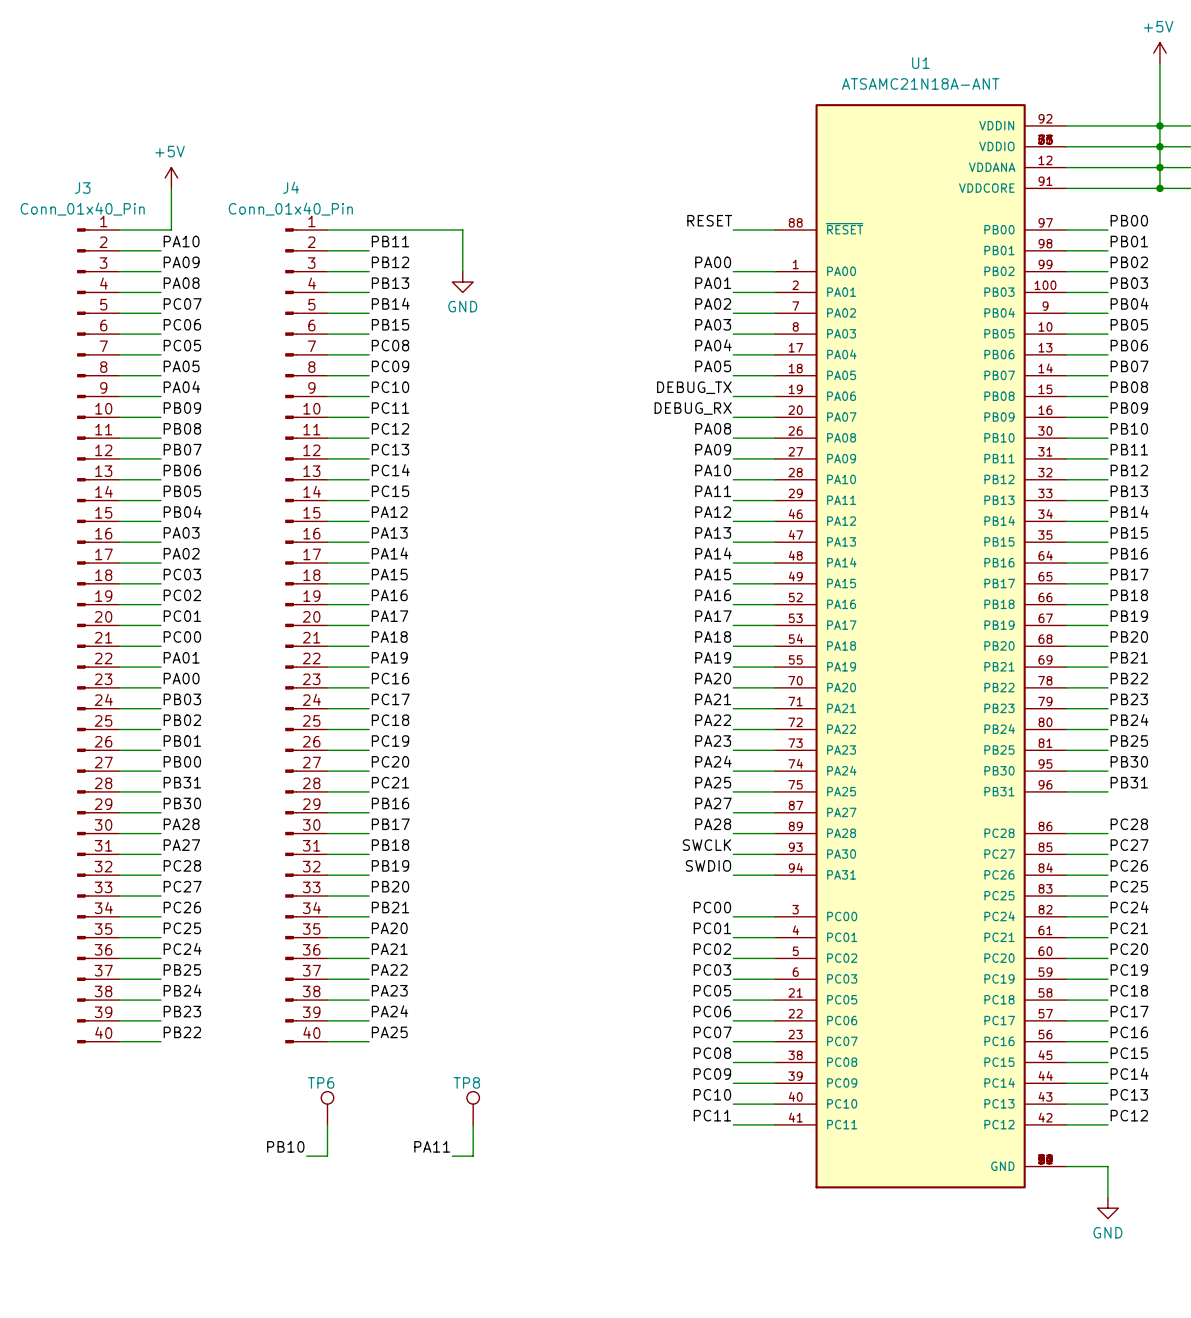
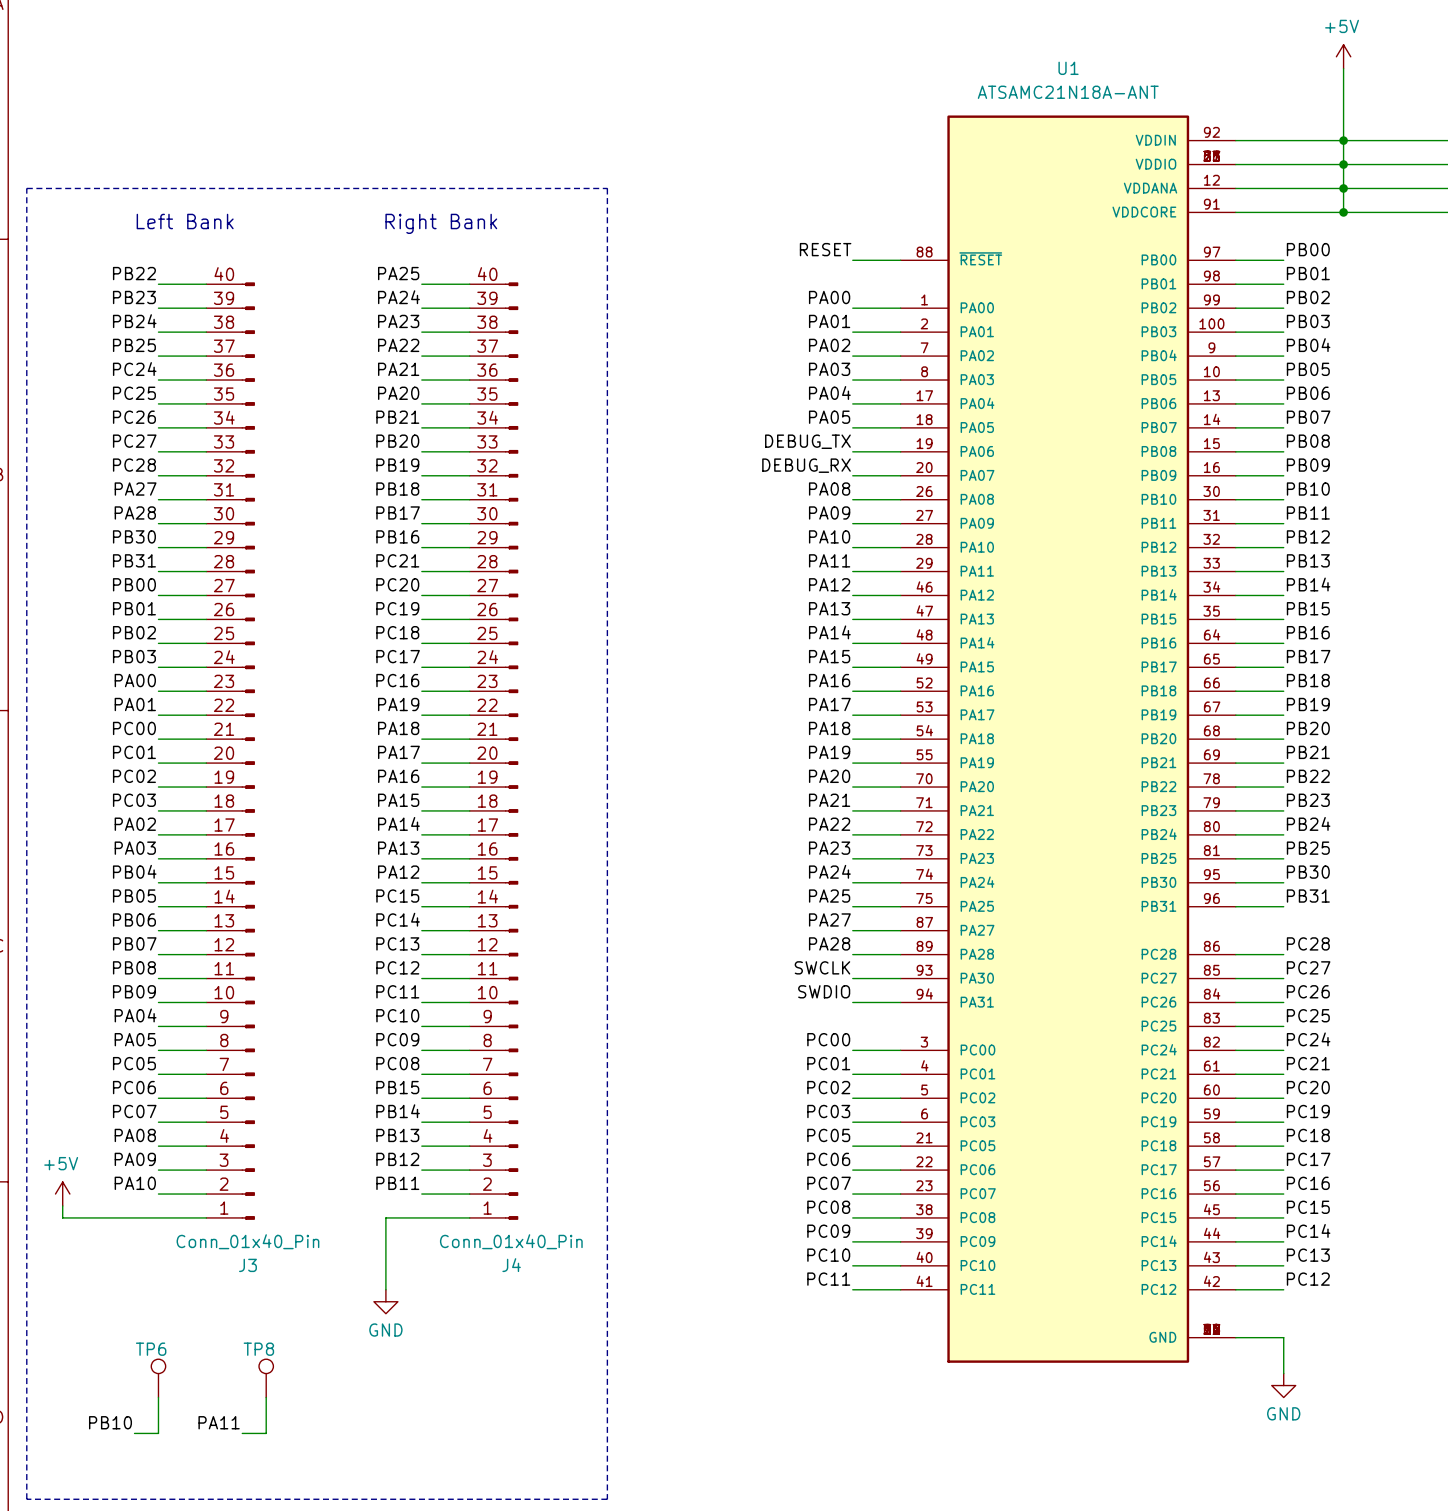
line: none -> (26, 188) (607, 188) (607, 1499) (26, 1499) (26, 188)
power symbol: +5V (171, 177) -> none
wire: (171, 188) (171, 230) (119, 230) -> none
text: none -> Left Bank (185, 221)
text: none -> Right Bank (441, 223)
wire: (327, 230) (462, 230) (462, 271) -> none
label: none -> PB22 (134, 273)
label: PA10 (181, 241) -> none
label: none -> PA25 (398, 273)
label: PB11 (390, 241) -> none
wire: (119, 250) (129, 250) -> (194, 284) (206, 284)
wire: (327, 250) (358, 250) -> (433, 284) (469, 284)
label: none -> PB23 (134, 297)
label: PA09 (181, 262) -> none
label: none -> PA24 (398, 297)
label: PB12 (390, 262) -> none
wire: (119, 271) (129, 271) -> (194, 308) (206, 308)
wire: (327, 271) (358, 271) -> (433, 308) (469, 308)
label: none -> PB24 (134, 321)
power symbol: GND (462, 282) -> none
label: PA08 (181, 283) -> none
label: none -> PA23 (398, 321)
label: PB13 (390, 283) -> none
wire: (119, 292) (129, 292) -> (194, 332) (206, 332)
wire: (327, 292) (358, 292) -> (433, 332) (469, 332)
label: none -> PB25 (134, 345)
label: PC07 (182, 303) -> none
label: none -> PA22 (398, 345)
label: PB14 (390, 303) -> none
wire: (119, 313) (129, 313) -> (194, 356) (206, 356)
wire: (327, 313) (358, 313) -> (433, 356) (469, 356)
label: none -> PC24 (134, 369)
label: PC06 (182, 324) -> none
label: none -> PA21 (398, 369)
label: PB15 (390, 324) -> none
wire: (119, 334) (129, 334) -> (194, 380) (206, 380)
wire: (327, 334) (358, 334) -> (433, 380) (469, 380)
label: none -> PC25 (134, 393)
label: PC05 (182, 345) -> none
label: none -> PA20 (398, 393)
label: PC08 (390, 345) -> none
wire: (119, 354) (129, 354) -> (194, 403) (206, 403)
wire: (327, 354) (358, 354) -> (433, 403) (469, 403)
label: none -> PC26 (134, 417)
label: PA05 (181, 366) -> none
label: none -> PB21 (397, 417)
label: PC09 (390, 366) -> none
wire: (119, 375) (129, 375) -> (194, 427) (206, 427)
wire: (327, 375) (358, 375) -> (433, 427) (469, 427)
label: PA04 (181, 386) -> none
label: none -> PC27 (134, 441)
label: none -> PB20 (397, 441)
label: PC10 (390, 387) -> none
wire: (119, 396) (129, 396) -> (194, 451) (206, 451)
wire: (327, 396) (358, 396) -> (433, 451) (469, 451)
label: none -> PC28 (134, 465)
label: PB09 (182, 408) -> none
label: none -> PB19 (397, 465)
label: PC11 (390, 408) -> none
wire: (119, 417) (129, 417) -> (194, 475) (206, 475)
wire: (327, 417) (358, 417) -> (433, 475) (469, 475)
label: none -> PA27 (135, 489)
label: PB08 (182, 428) -> none
label: none -> PB18 (397, 489)
label: PC12 (390, 428) -> none
wire: (119, 438) (129, 438) -> (194, 499) (206, 499)
wire: (327, 438) (358, 438) -> (433, 499) (469, 499)
label: none -> PA28 (135, 512)
label: PB07 (182, 449) -> none
label: none -> PB17 (398, 512)
label: PC13 (390, 449) -> none
wire: (119, 458) (129, 458) -> (194, 523) (206, 523)
wire: (327, 458) (358, 458) -> (433, 523) (469, 523)
label: none -> PB30 (134, 536)
label: PB06 (182, 470) -> none
label: none -> PB16 (397, 536)
label: PC14 (390, 470) -> none
wire: (119, 479) (129, 479) -> (194, 547) (206, 547)
wire: (327, 479) (358, 479) -> (433, 547) (469, 547)
label: none -> PB31 (134, 560)
label: PB05 (182, 491) -> none
label: none -> PC21 (397, 560)
label: PC15 (390, 491) -> none
wire: (119, 500) (129, 500) -> (194, 571) (206, 571)
wire: (327, 500) (358, 500) -> (433, 571) (469, 571)
label: PB04 (182, 511) -> none
label: none -> PB00 (134, 584)
label: none -> PC20 (397, 584)
label: PA12 (389, 512) -> none
wire: (119, 521) (129, 521) -> (194, 595) (206, 595)
wire: (327, 521) (358, 521) -> (433, 595) (469, 595)
label: none -> PB01 (134, 608)
label: PA03 (181, 532) -> none
label: none -> PC19 (397, 608)
label: PA13 (389, 532) -> none
wire: (119, 542) (129, 542) -> (194, 619) (206, 619)
wire: (327, 542) (358, 542) -> (433, 619) (469, 619)
label position: PA02 (181, 553) -> PA02 (135, 824)
label position: PA14 (390, 553) -> PA14 (398, 823)
wire: (119, 563) (129, 563) -> (194, 643) (206, 643)
wire: (327, 563) (358, 563) -> (433, 643) (469, 643)
label position: PC03 (182, 574) -> PC03 (134, 800)
label position: PA15 (389, 574) -> PA15 (398, 800)
wire: (119, 583) (129, 583) -> (194, 667) (206, 667)
wire: (327, 583) (358, 583) -> (433, 667) (469, 667)
label position: PC02 (182, 595) -> PC02 (134, 776)
label position: PA16 (389, 595) -> PA16 (398, 776)
wire: (119, 604) (129, 604) -> (194, 691) (206, 691)
wire: (327, 604) (358, 604) -> (433, 691) (469, 691)
label position: PC01 (182, 616) -> PC01 (134, 752)
label position: PA17 (390, 616) -> PA17 (398, 752)
wire: (119, 625) (129, 625) -> (194, 715) (206, 715)
wire: (327, 625) (358, 625) -> (433, 715) (469, 715)
J3 rotation: 0° (82, 635) -> 180° (248, 751)
J4 rotation: 0° (291, 635) -> 180° (511, 751)
label position: PC00 (182, 636) -> PC00 (134, 728)
label position: PA18 (389, 636) -> PA18 (398, 728)
wire: (119, 646) (129, 646) -> (194, 739) (206, 739)
wire: (327, 646) (358, 646) -> (433, 739) (469, 739)
label position: PA01 (181, 657) -> PA01 (135, 704)
label position: PA19 (389, 657) -> PA19 (398, 704)
wire: (119, 667) (129, 667) -> (194, 763) (206, 763)
wire: (327, 667) (358, 667) -> (433, 763) (469, 763)
label position: PA00 (181, 678) -> PA00 (135, 680)
label position: PC16 (390, 678) -> PC16 (397, 680)
wire: (119, 687) (129, 687) -> (194, 787) (206, 787)
wire: (327, 687) (358, 687) -> (433, 787) (469, 787)
label position: PB03 (182, 699) -> PB03 (134, 656)
label position: PC17 (390, 699) -> PC17 (398, 656)
wire: (119, 708) (129, 708) -> (194, 810) (206, 810)
wire: (327, 708) (358, 708) -> (433, 810) (469, 810)
label position: PB02 (182, 720) -> PB02 (134, 632)
label position: PC18 (390, 720) -> PC18 (397, 632)
wire: (119, 729) (129, 729) -> (194, 834) (206, 834)
wire: (327, 729) (358, 729) -> (433, 834) (469, 834)
label: none -> PA03 (135, 848)
label: PB01 (182, 741) -> none
label: none -> PA13 (398, 848)
label: PC19 (390, 741) -> none
wire: (119, 750) (129, 750) -> (194, 858) (206, 858)
wire: (327, 750) (358, 750) -> (433, 858) (469, 858)
label: none -> PB04 (134, 871)
label: PB00 (182, 761) -> none
label: none -> PA12 (398, 872)
label: PC20 (390, 761) -> none
wire: (119, 771) (129, 771) -> (194, 882) (206, 882)
wire: (327, 771) (358, 771) -> (433, 882) (469, 882)
label: none -> PB05 (134, 896)
label: PB31 (182, 782) -> none
label: none -> PC15 (397, 896)
label: PC21 (390, 782) -> none
wire: (119, 791) (129, 791) -> (194, 906) (206, 906)
wire: (327, 791) (358, 791) -> (433, 906) (469, 906)
label: none -> PB06 (134, 919)
label: PB30 (182, 803) -> none
label: none -> PC14 (398, 919)
label: PB16 (390, 803) -> none
wire: (119, 812) (129, 812) -> (194, 930) (206, 930)
wire: (327, 812) (358, 812) -> (433, 930) (469, 930)
label: none -> PB07 (134, 943)
label: PA28 (181, 824) -> none
label: none -> PC13 (397, 943)
label: PB17 (390, 824) -> none
wire: (119, 833) (129, 833) -> (194, 954) (206, 954)
wire: (327, 833) (358, 833) -> (433, 954) (469, 954)
label: none -> PB08 (134, 967)
label: PA27 (181, 845) -> none
label: none -> PC12 (397, 967)
label: PB18 (390, 845) -> none
wire: (119, 854) (129, 854) -> (194, 978) (206, 978)
wire: (327, 854) (358, 854) -> (433, 978) (469, 978)
label: none -> PB09 (134, 991)
label: PC28 (182, 865) -> none
label: none -> PC11 (397, 991)
label: PB19 (390, 865) -> none
wire: (119, 875) (129, 875) -> (194, 1002) (206, 1002)
wire: (327, 875) (358, 875) -> (433, 1002) (469, 1002)
label: none -> PA04 (135, 1015)
label: PC27 (182, 886) -> none
label: none -> PC10 (397, 1015)
label: PB20 (390, 886) -> none
wire: (119, 896) (129, 896) -> (194, 1026) (206, 1026)
wire: (327, 896) (358, 896) -> (433, 1026) (469, 1026)
label: none -> PA05 (135, 1039)
label: PC26 (182, 907) -> none
label: none -> PC09 (397, 1039)
label: PB21 (390, 907) -> none
wire: (119, 916) (129, 916) -> (194, 1050) (206, 1050)
wire: (327, 916) (358, 916) -> (433, 1050) (469, 1050)
label: none -> PC05 (134, 1063)
label: PC25 (182, 928) -> none
label: none -> PC08 (397, 1063)
label: PA20 (389, 928) -> none
wire: (119, 937) (129, 937) -> (194, 1074) (206, 1074)
wire: (327, 937) (358, 937) -> (433, 1074) (469, 1074)
label: PC24 (182, 948) -> none
label: none -> PC06 (134, 1087)
label: none -> PB15 (397, 1087)
label: PA21 (389, 949) -> none
wire: (119, 958) (129, 958) -> (194, 1098) (206, 1098)
wire: (327, 958) (358, 958) -> (433, 1098) (469, 1098)
label: none -> PC07 (134, 1111)
label: PB25 (182, 969) -> none
label: none -> PB14 (398, 1111)
label: PA22 (389, 969) -> none
wire: (119, 979) (129, 979) -> (194, 1122) (206, 1122)
wire: (327, 979) (358, 979) -> (433, 1122) (469, 1122)
label: none -> PA08 (135, 1135)
label: PB24 (182, 990) -> none
label: none -> PB13 (397, 1135)
label: PA23 (389, 990) -> none
wire: (119, 1000) (129, 1000) -> (194, 1146) (206, 1146)
wire: (327, 1000) (358, 1000) -> (433, 1146) (469, 1146)
label: none -> PA09 (135, 1159)
label: PB23 (182, 1011) -> none
label: none -> PB12 (397, 1159)
label: PA24 (390, 1011) -> none
wire: (119, 1020) (129, 1020) -> (194, 1170) (206, 1170)
wire: (327, 1020) (358, 1020) -> (433, 1170) (469, 1170)
label: none -> PA10 (135, 1183)
label: PB22 (182, 1032) -> none
label: none -> PB11 (397, 1183)
label: PA25 (389, 1032) -> none
power symbol: none -> +5V (62, 1194)
wire: (119, 1041) (129, 1041) -> (194, 1194) (206, 1194)
wire: (327, 1041) (358, 1041) -> (433, 1194) (469, 1194)
wire: none -> (62, 1205) (62, 1217) (206, 1217)
TP6 position: (327, 1108) -> (158, 1378)
TP8 position: (473, 1108) -> (266, 1378)
wire: (327, 1124) (327, 1156) (306, 1156) -> (385, 1289) (385, 1217) (469, 1217)
wire: (473, 1124) (473, 1156) (452, 1156) -> none
power symbol: none -> GND (385, 1301)
label: PB10 (285, 1146) -> none
label: PA11 (432, 1146) -> none
wire: none -> (158, 1397) (158, 1433) (134, 1433)
wire: none -> (266, 1397) (266, 1433) (242, 1433)
label: none -> PB10 (110, 1422)
label: none -> PA11 (219, 1422)

